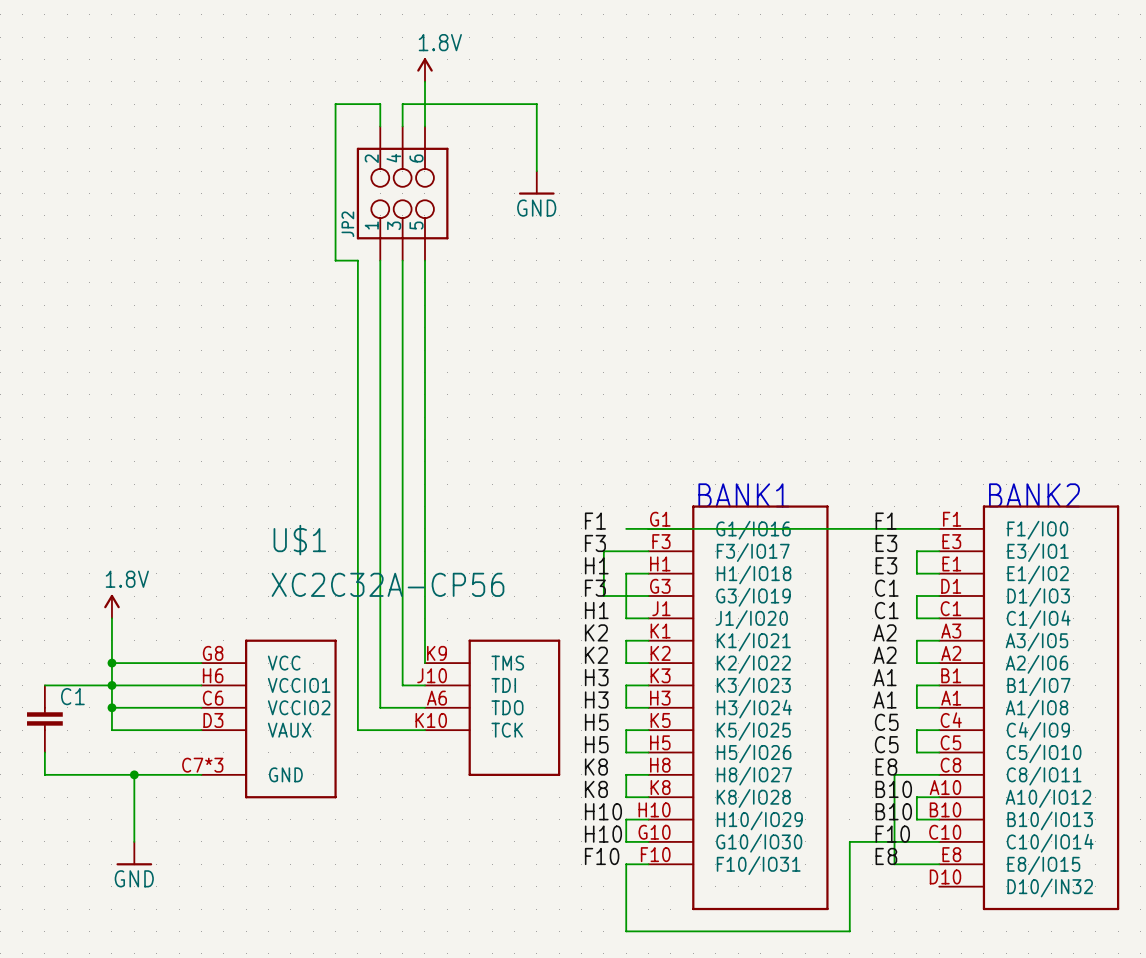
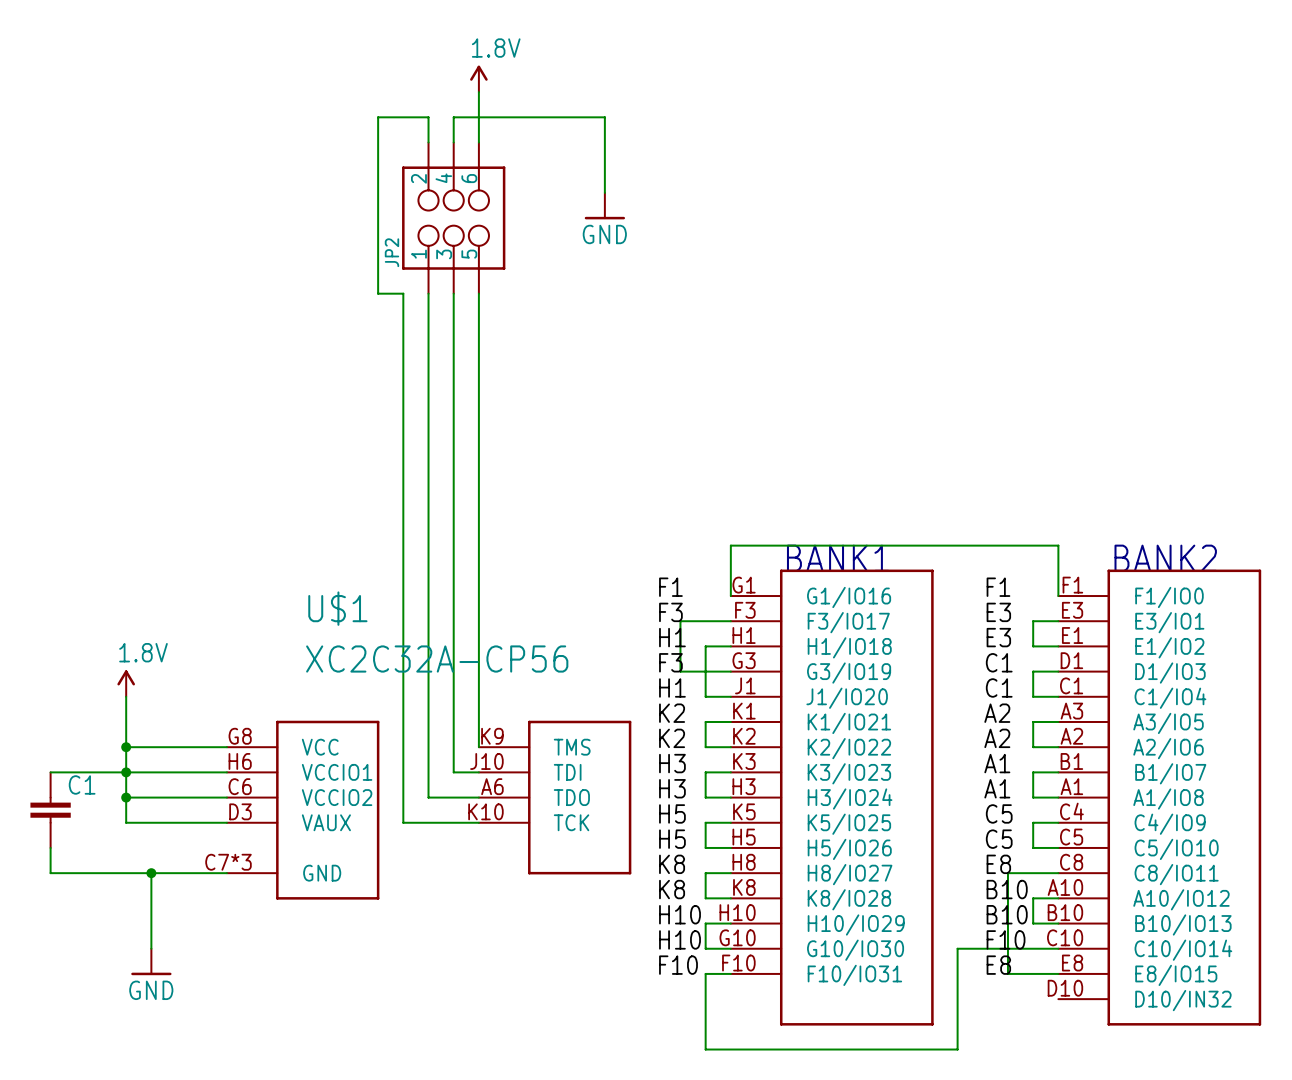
wire: (626, 528) (939, 528) -> (730, 596) (730, 545) (1058, 545) (1058, 596)

